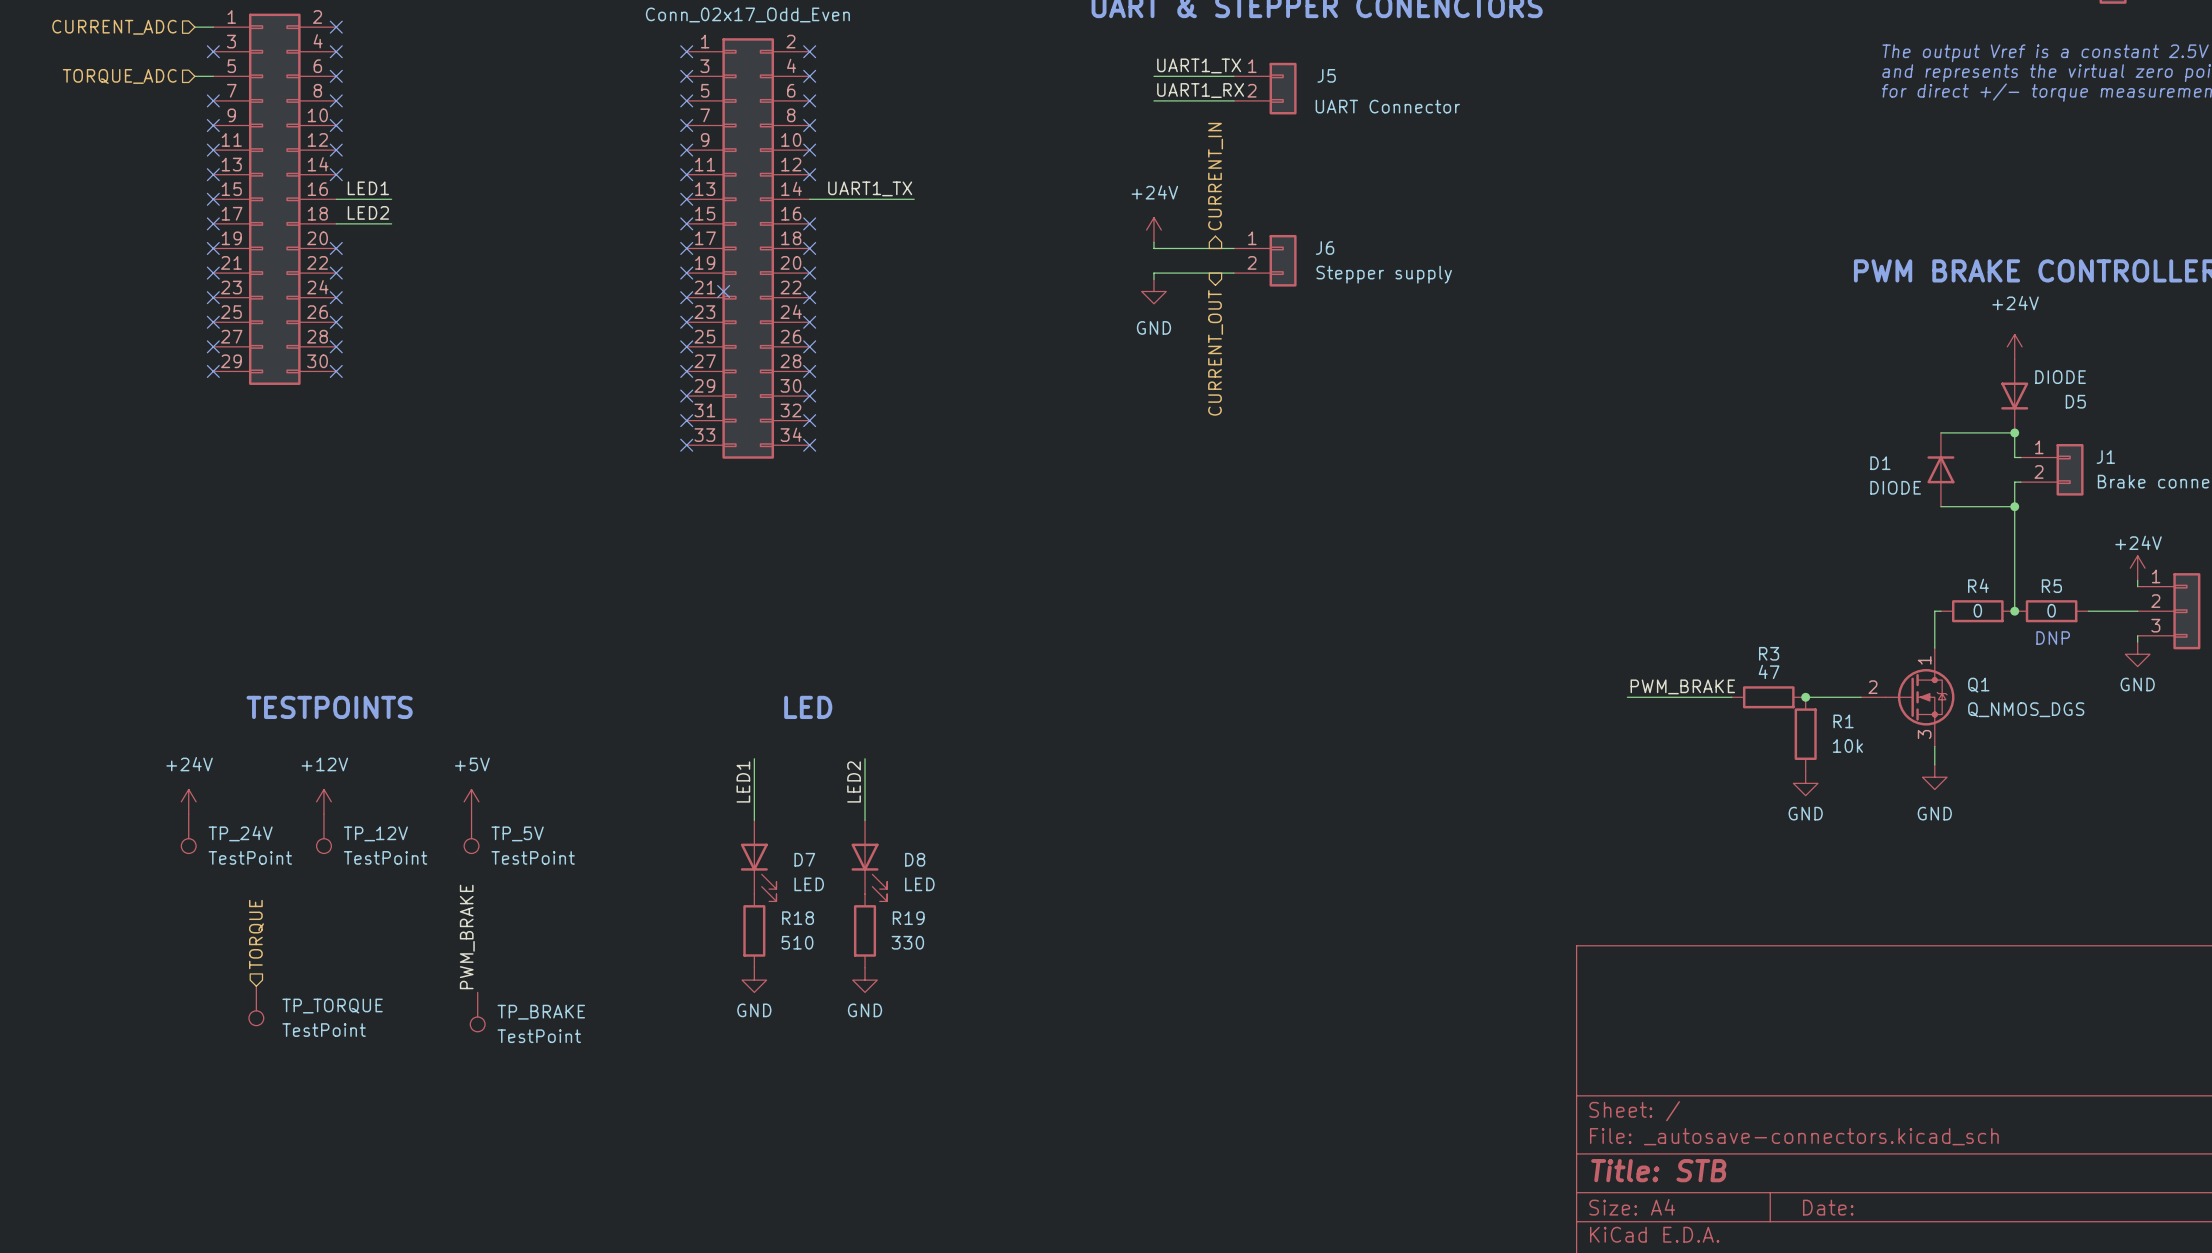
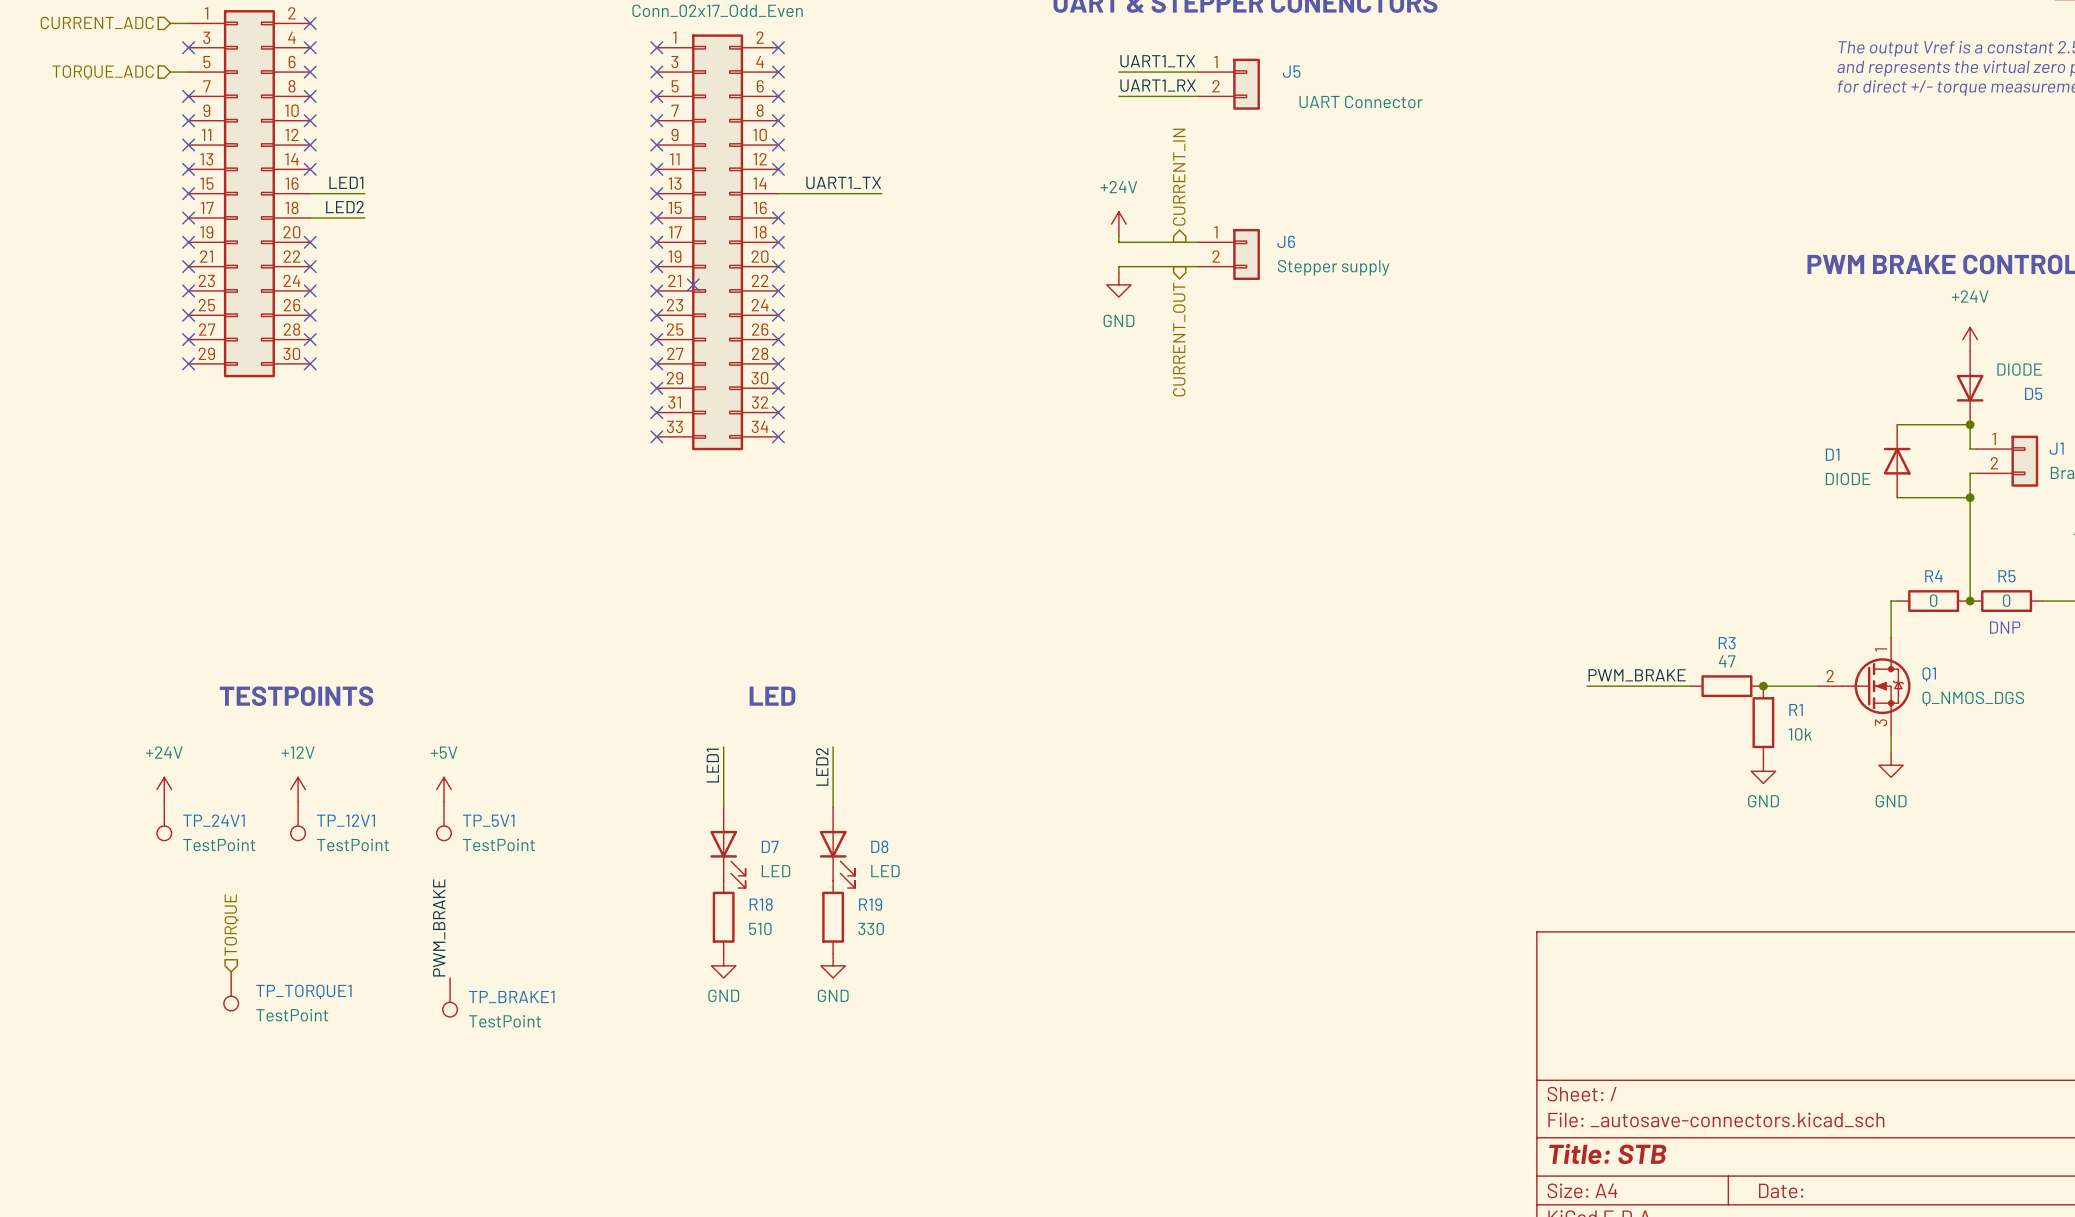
TP_24V name: TP_24V (240, 833) -> TP_24V1 (213, 820)
TP_12V name: TP_12V (375, 833) -> TP_12V1 (346, 820)
TP_5V name: TP_5V (517, 833) -> TP_5V1 (488, 820)
TP_TORQUE name: TP_TORQUE (332, 1006) -> TP_TORQUE1 (303, 991)
TP_BRAKE name: TP_BRAKE (541, 1012) -> TP_BRAKE1 (511, 997)

